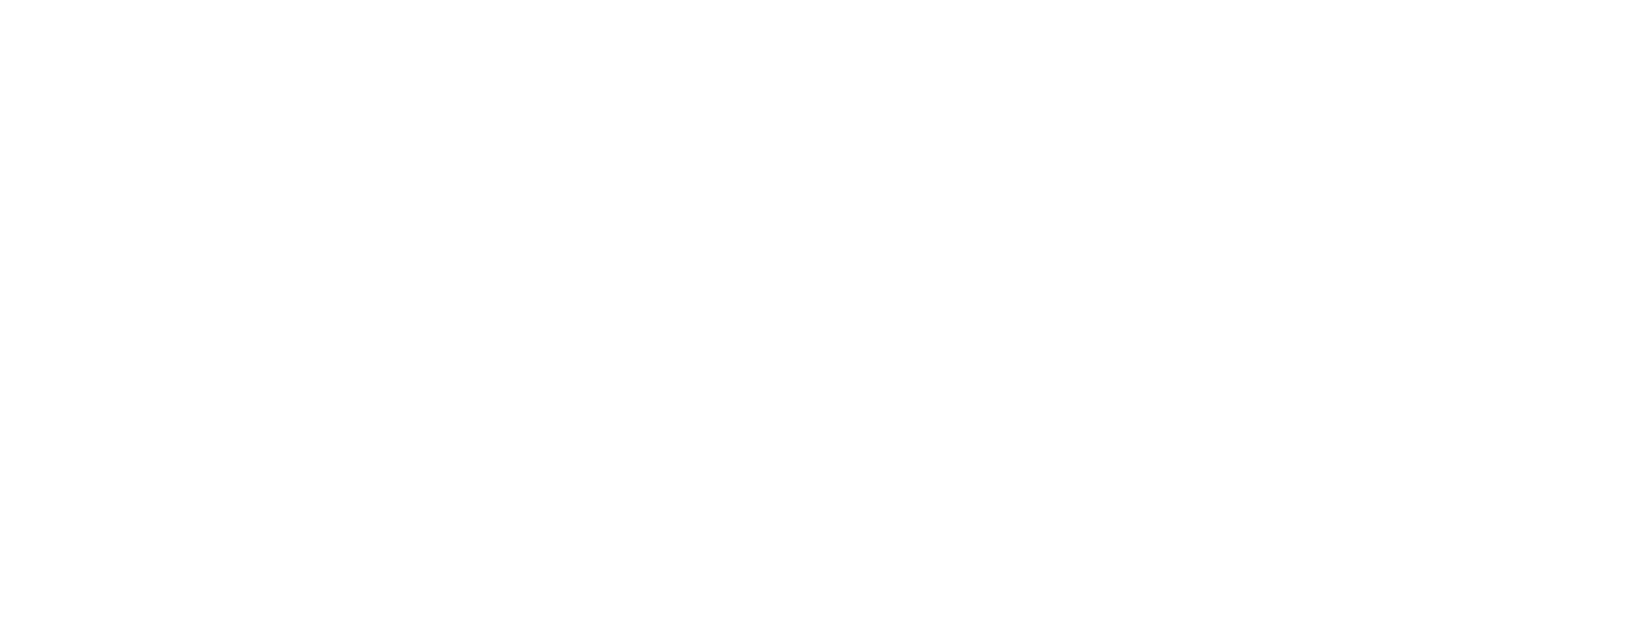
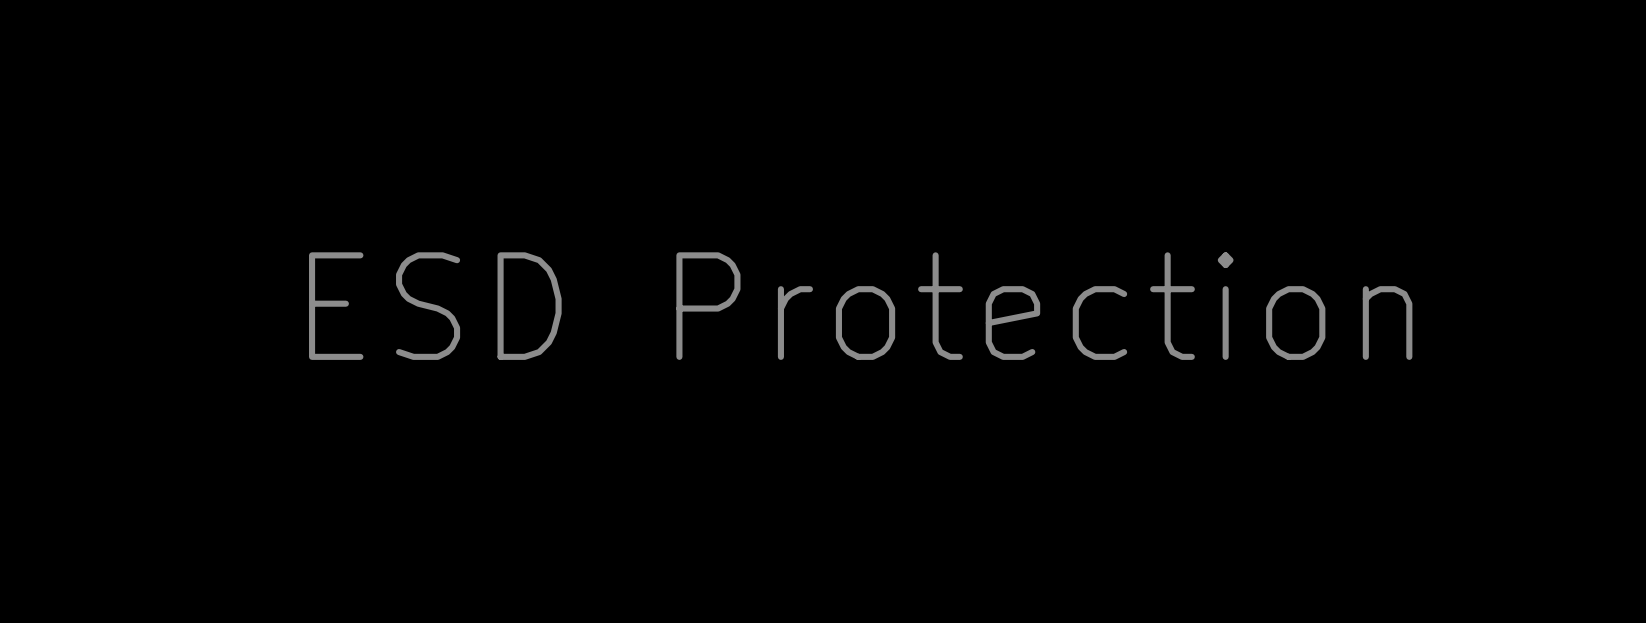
text: none -> ESD Protection (860, 306)

